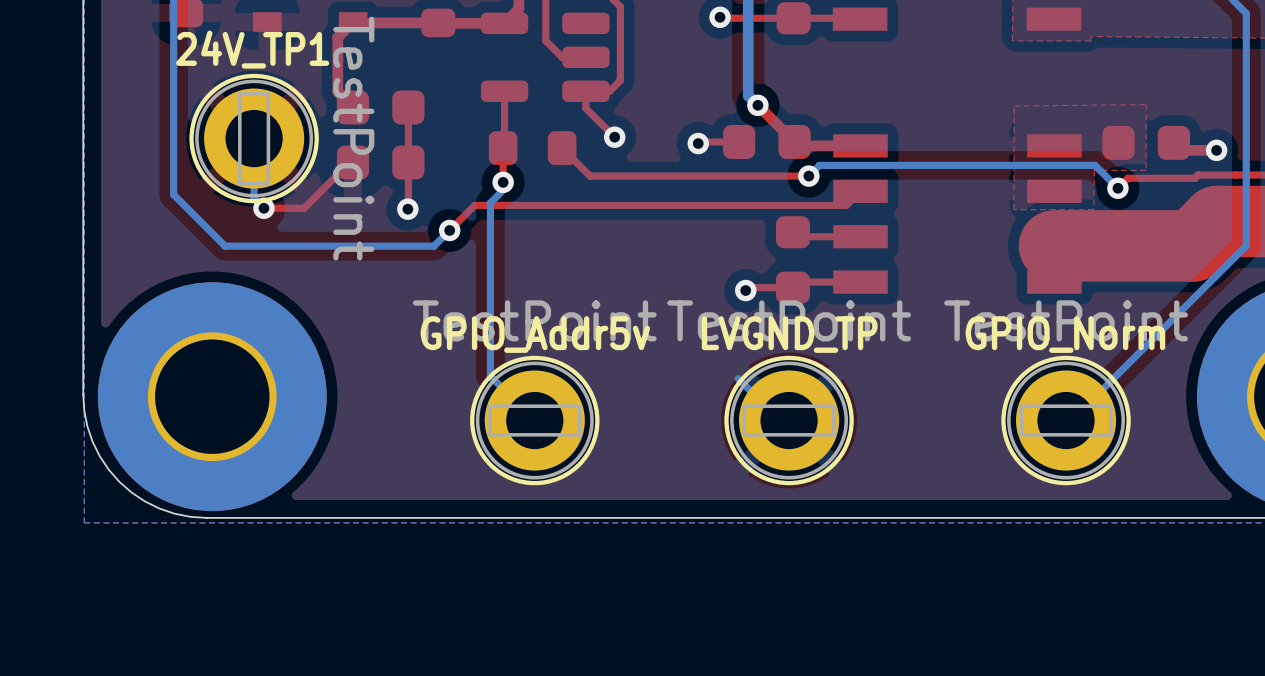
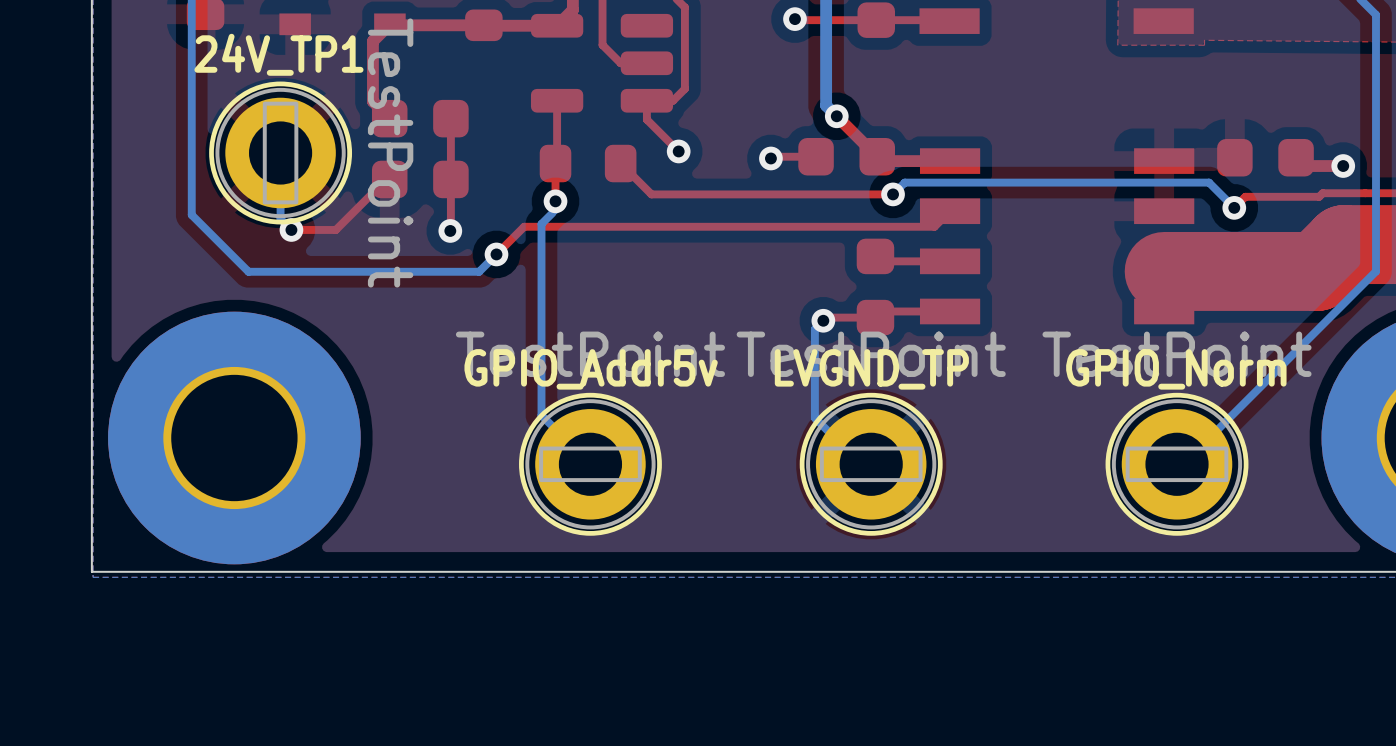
top zone outline: (1146, 104) (1014, 106) (1013, 209) (1093, 209) (1094, 170) (1146, 170) (1146, 104) -> none
bottom track: none -> (823, 320) (814, 329) (814, 418)
board edge: (83, 394) (84, 410) (92, 441) (99, 456) (119, 481) (144, 501) (159, 508) (190, 516) (206, 517) -> (91, 435) (91, 571) (228, 571)

